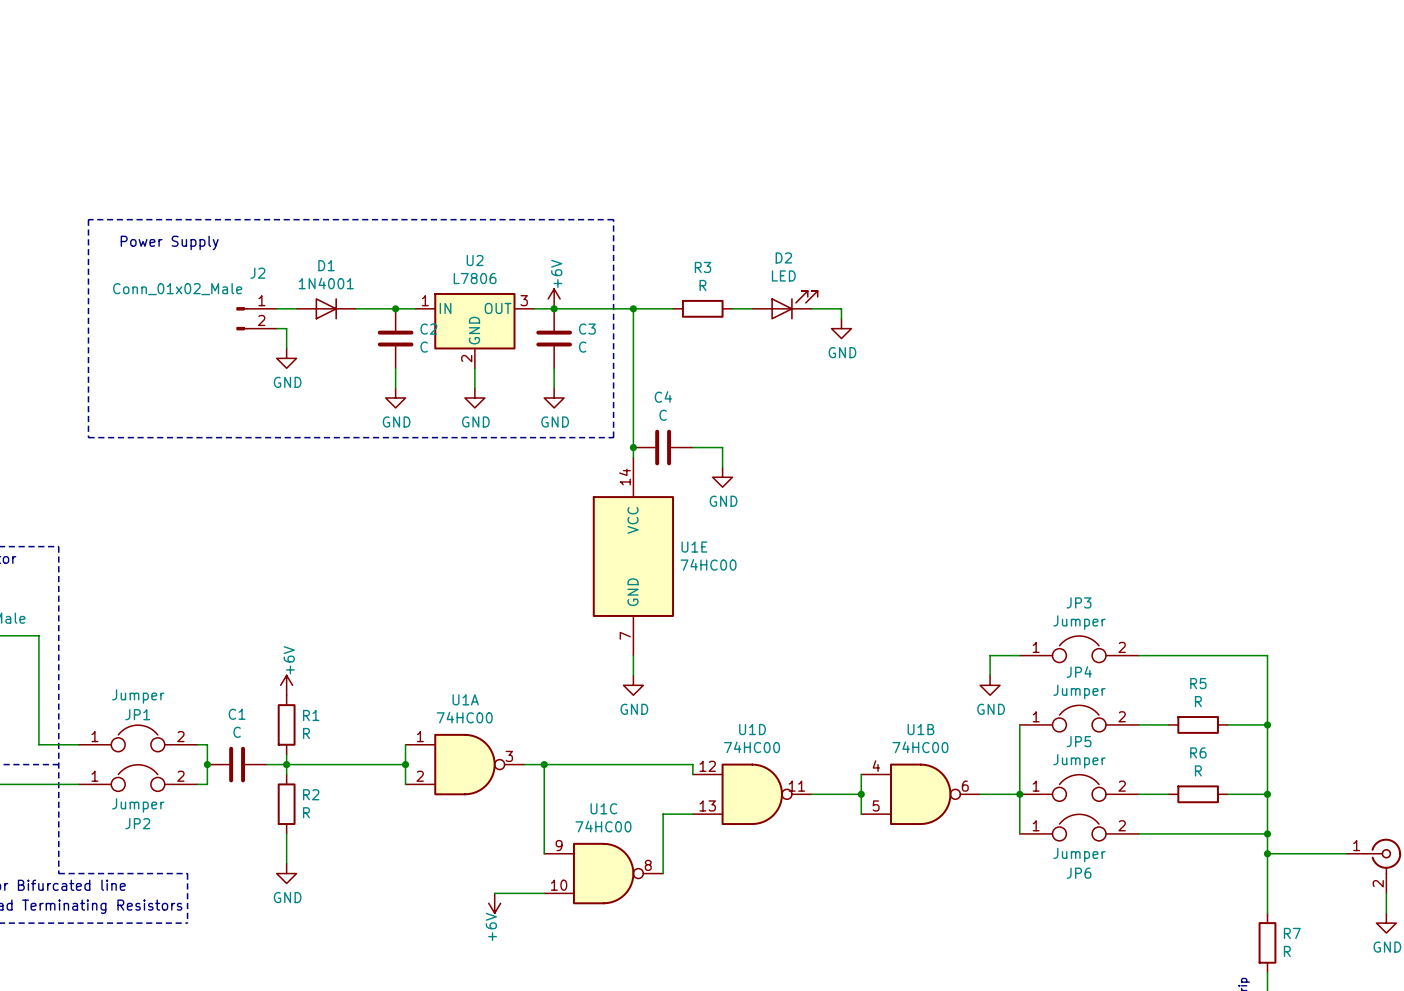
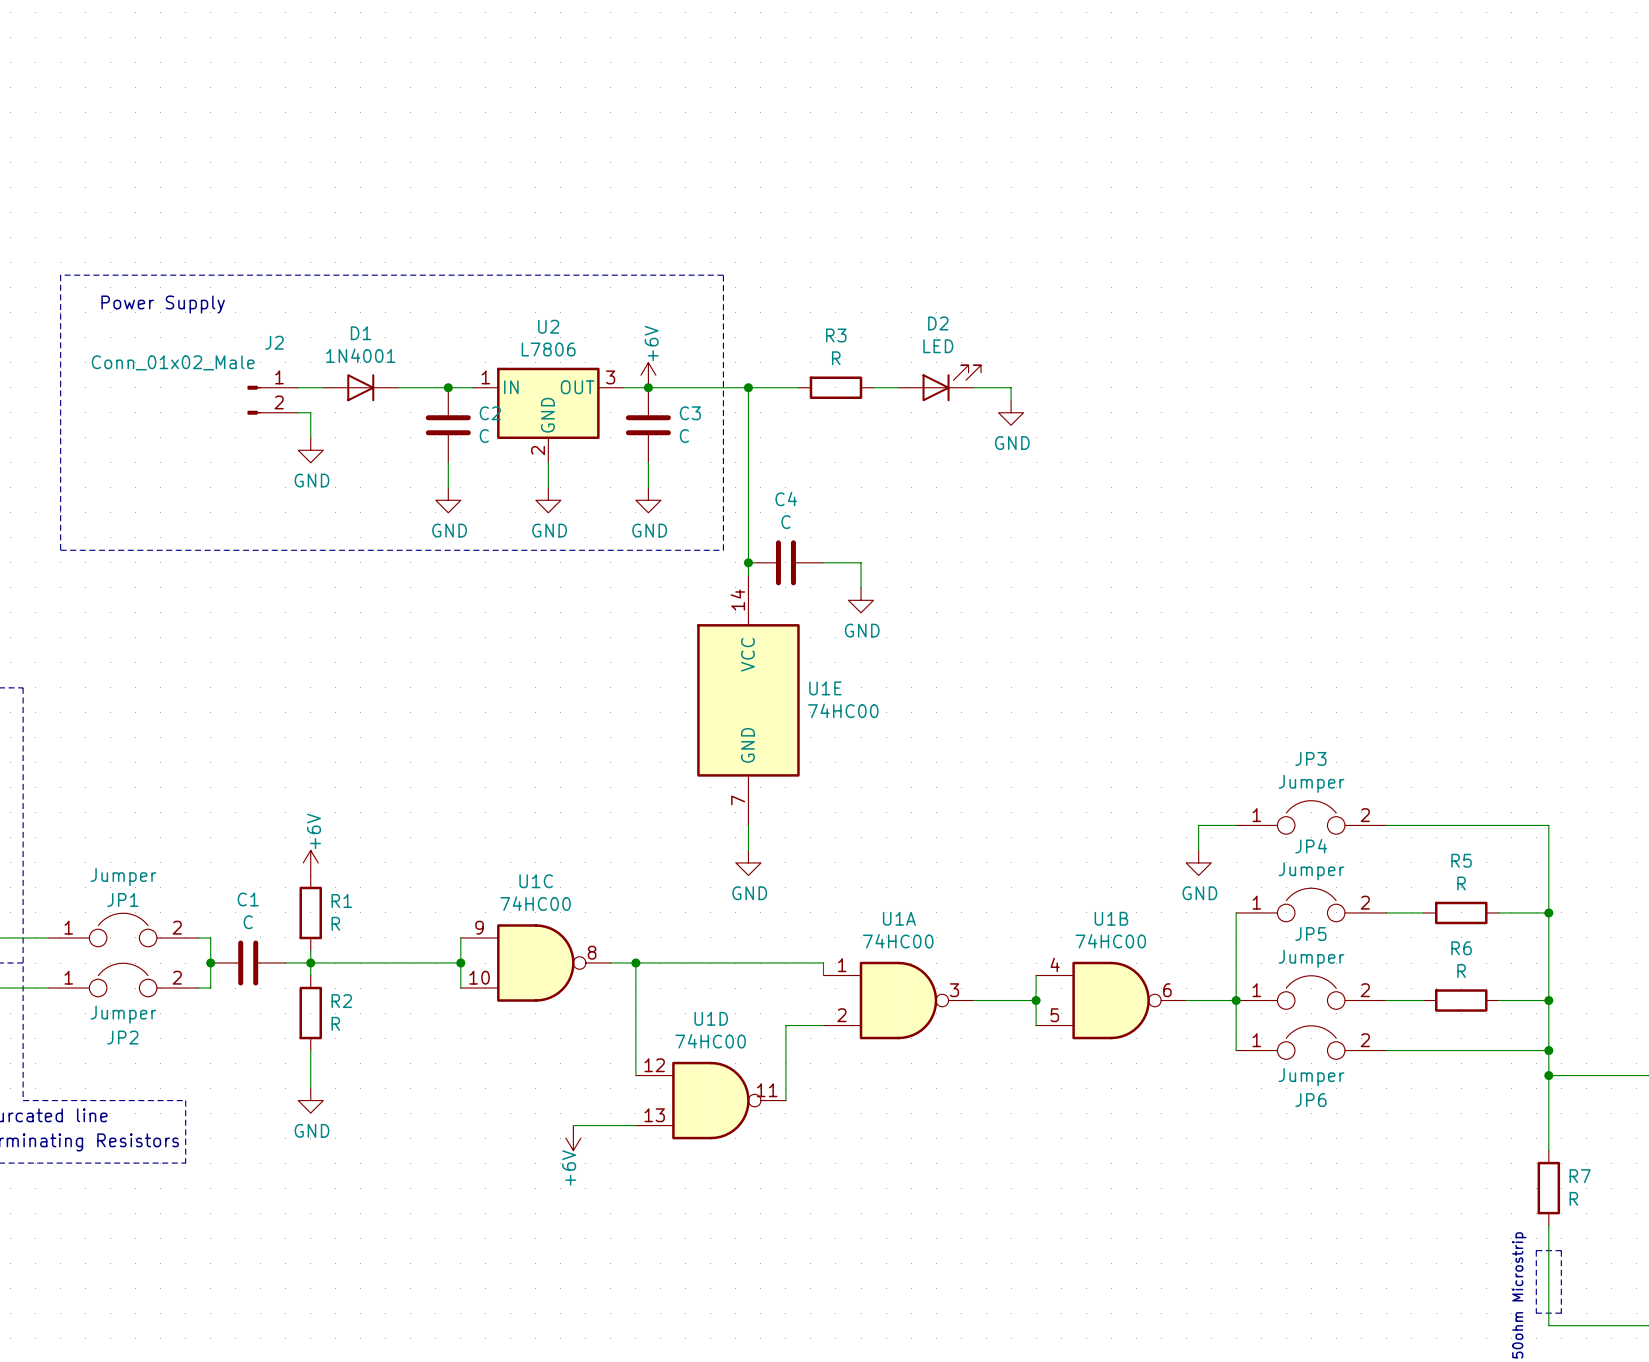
U1A position: (464, 764) -> (898, 1000)
U1D position: (752, 794) -> (710, 1100)
U1C position: (603, 873) -> (535, 963)

